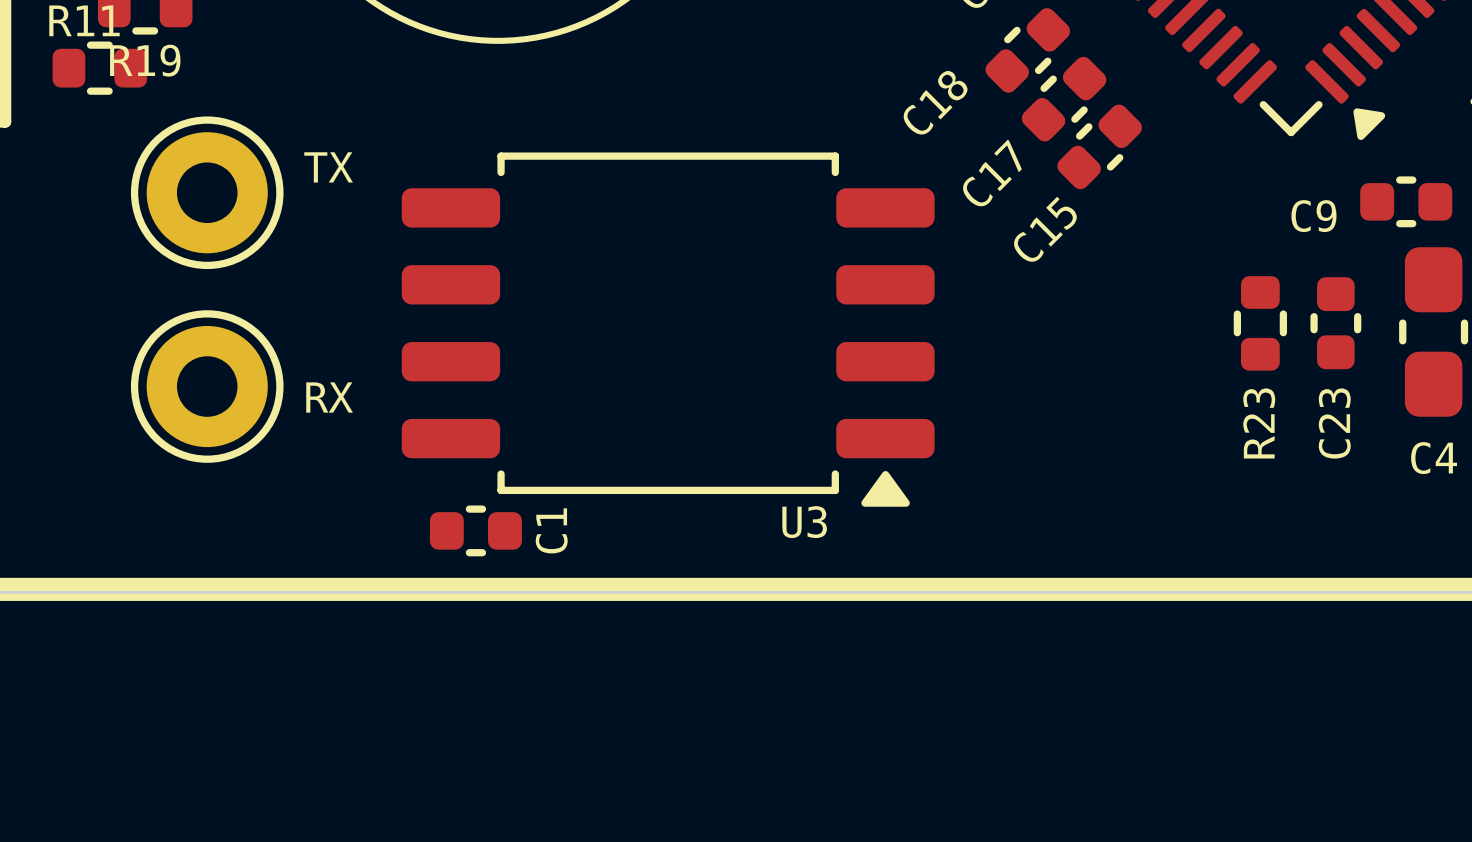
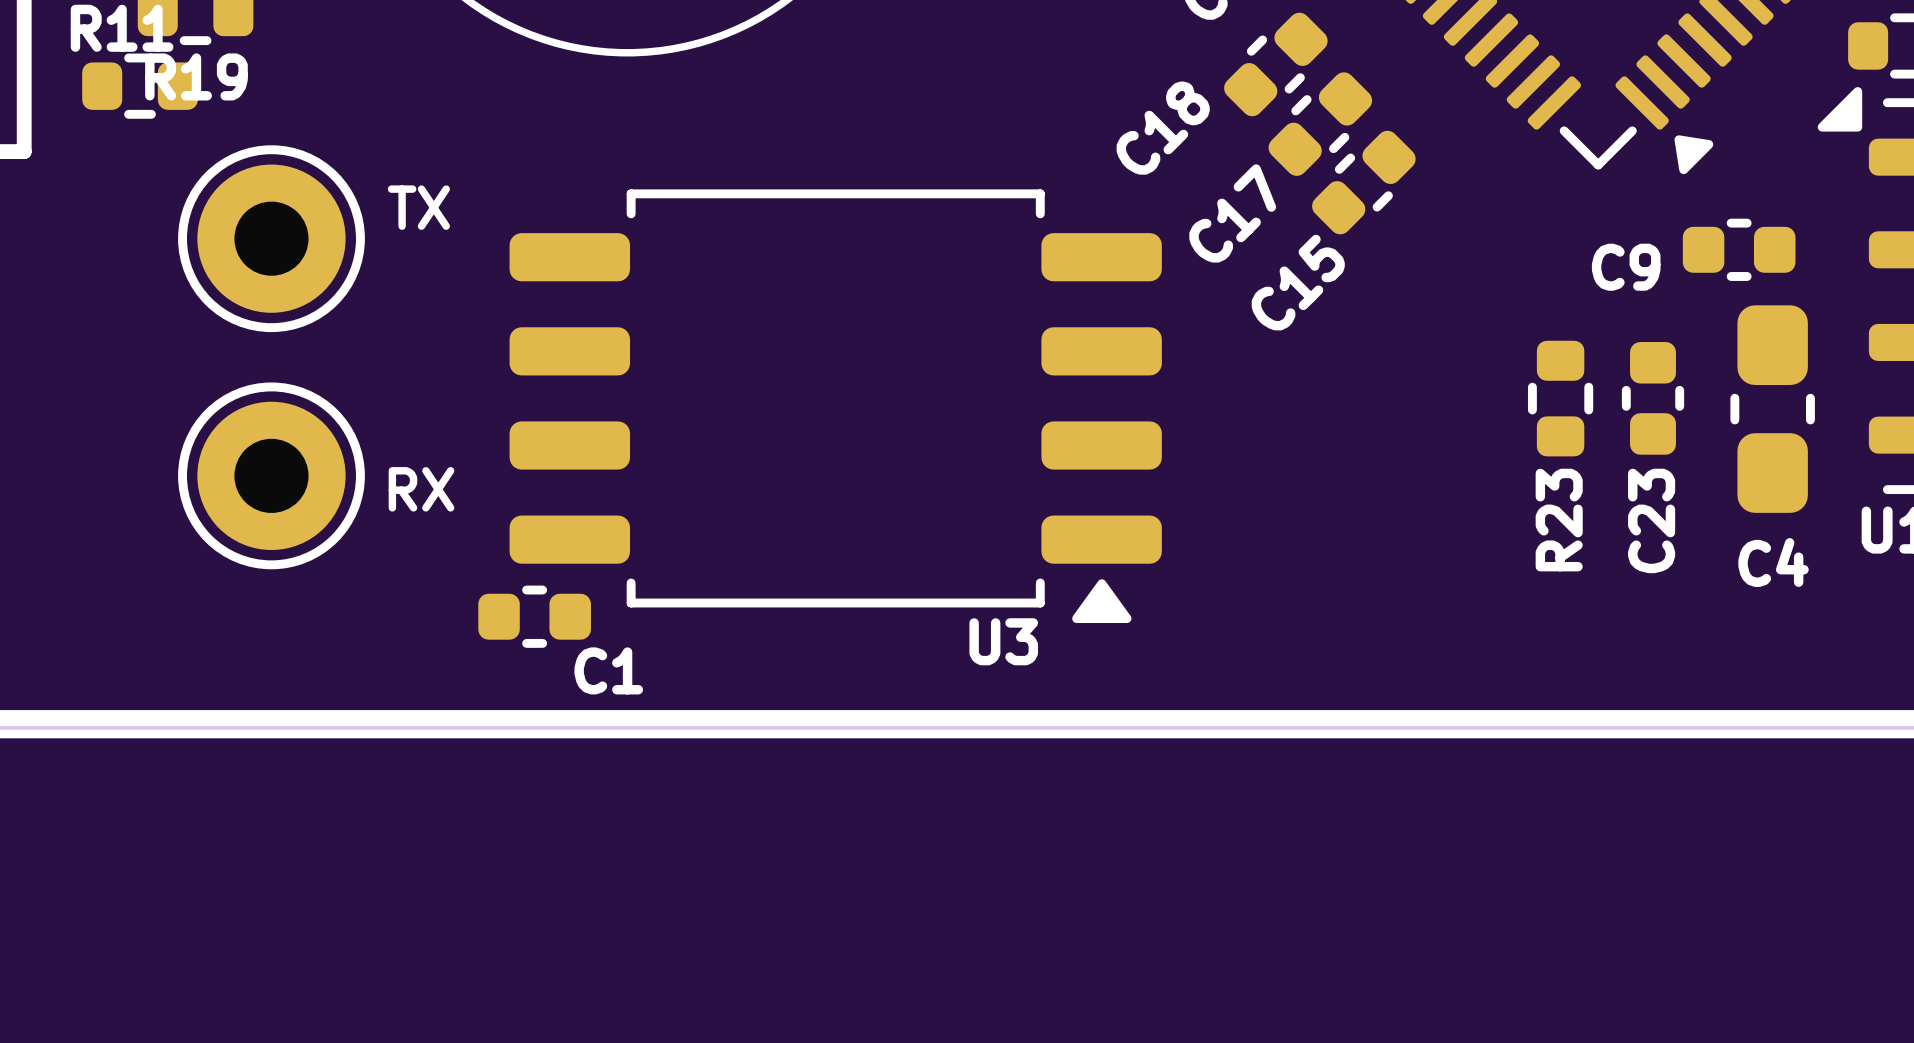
C1 position: (475, 530) -> (534, 616)
C1 name rotation: 0° (551, 530) -> 90° clockwise (608, 670)

